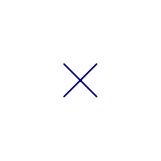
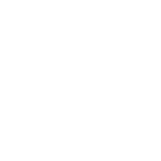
no-connect mark: (80, 80) -> none

